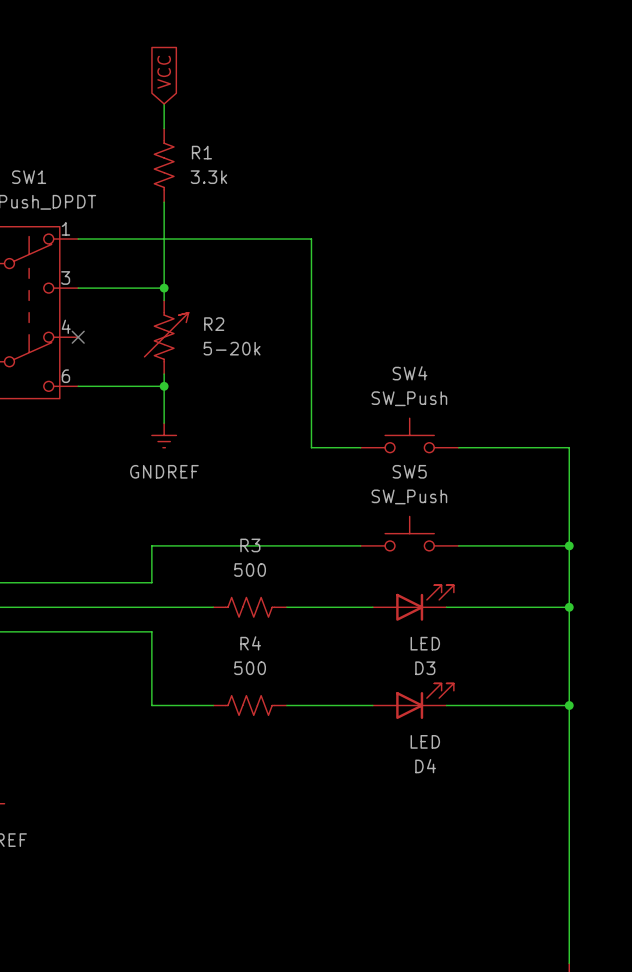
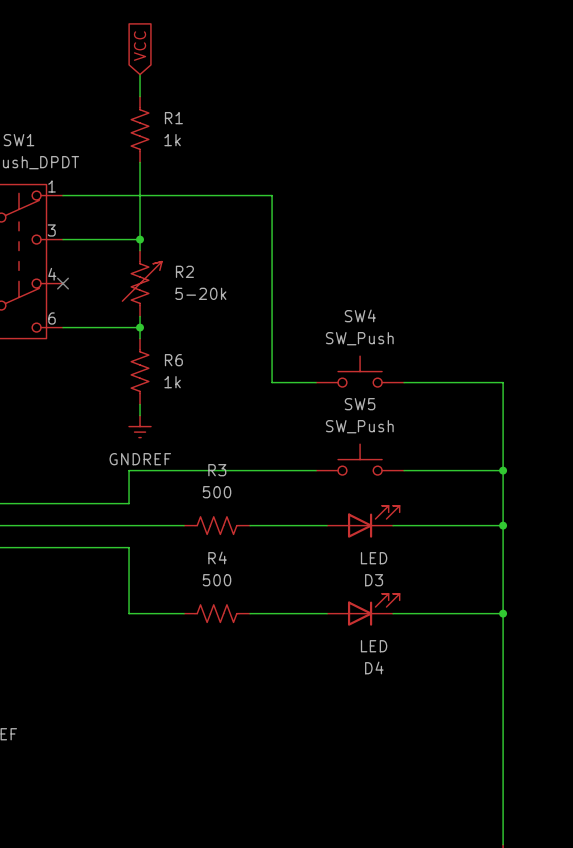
R1 value: 3.3k (208, 177) -> 1k (172, 140)
power symbol position: GNDREF (164, 435) -> GNDREF (140, 426)
R6: none -> 1k (140, 371)
wire: none -> (140, 404) (140, 415)

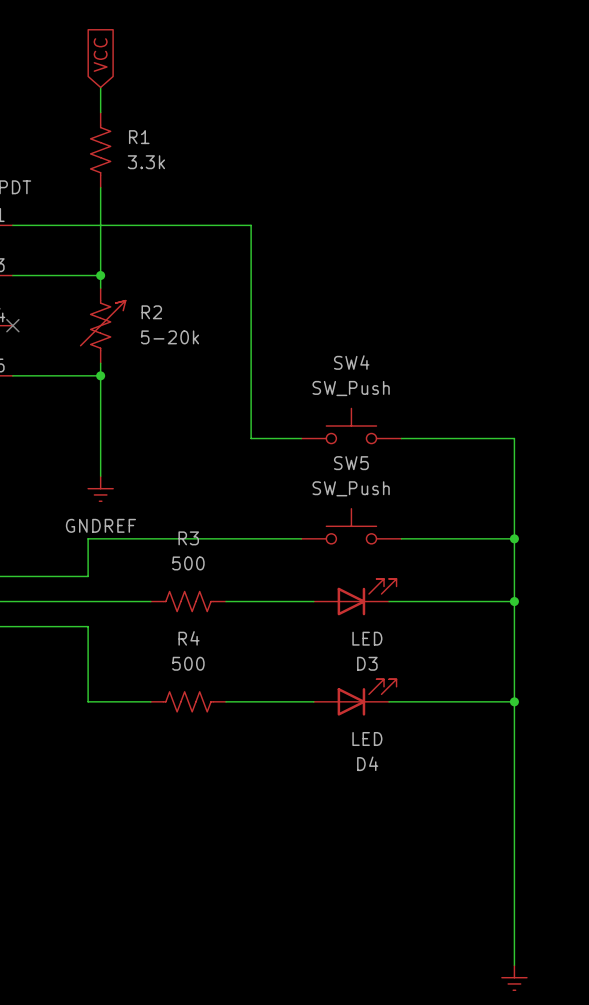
R1 value: 1k (172, 140) -> 3.3k (146, 162)
R6: 1k (140, 371) -> none

